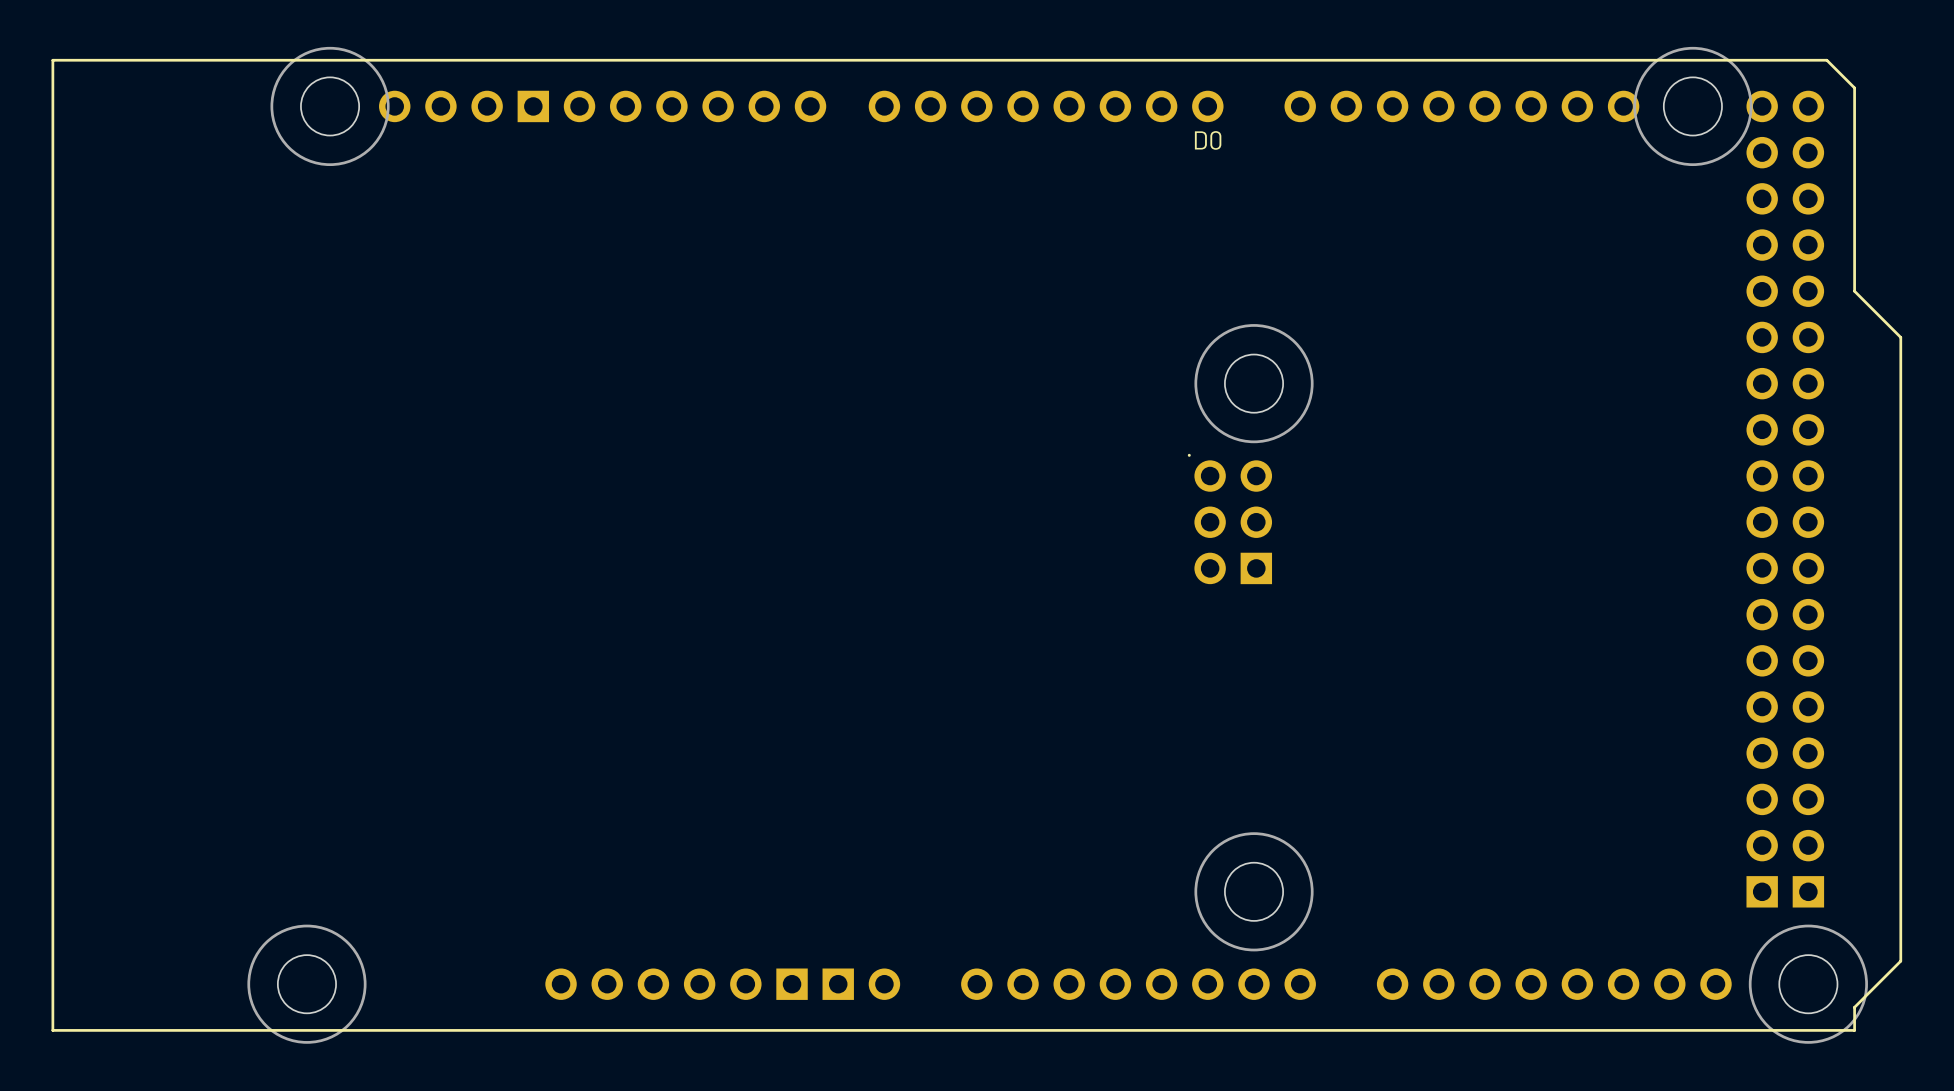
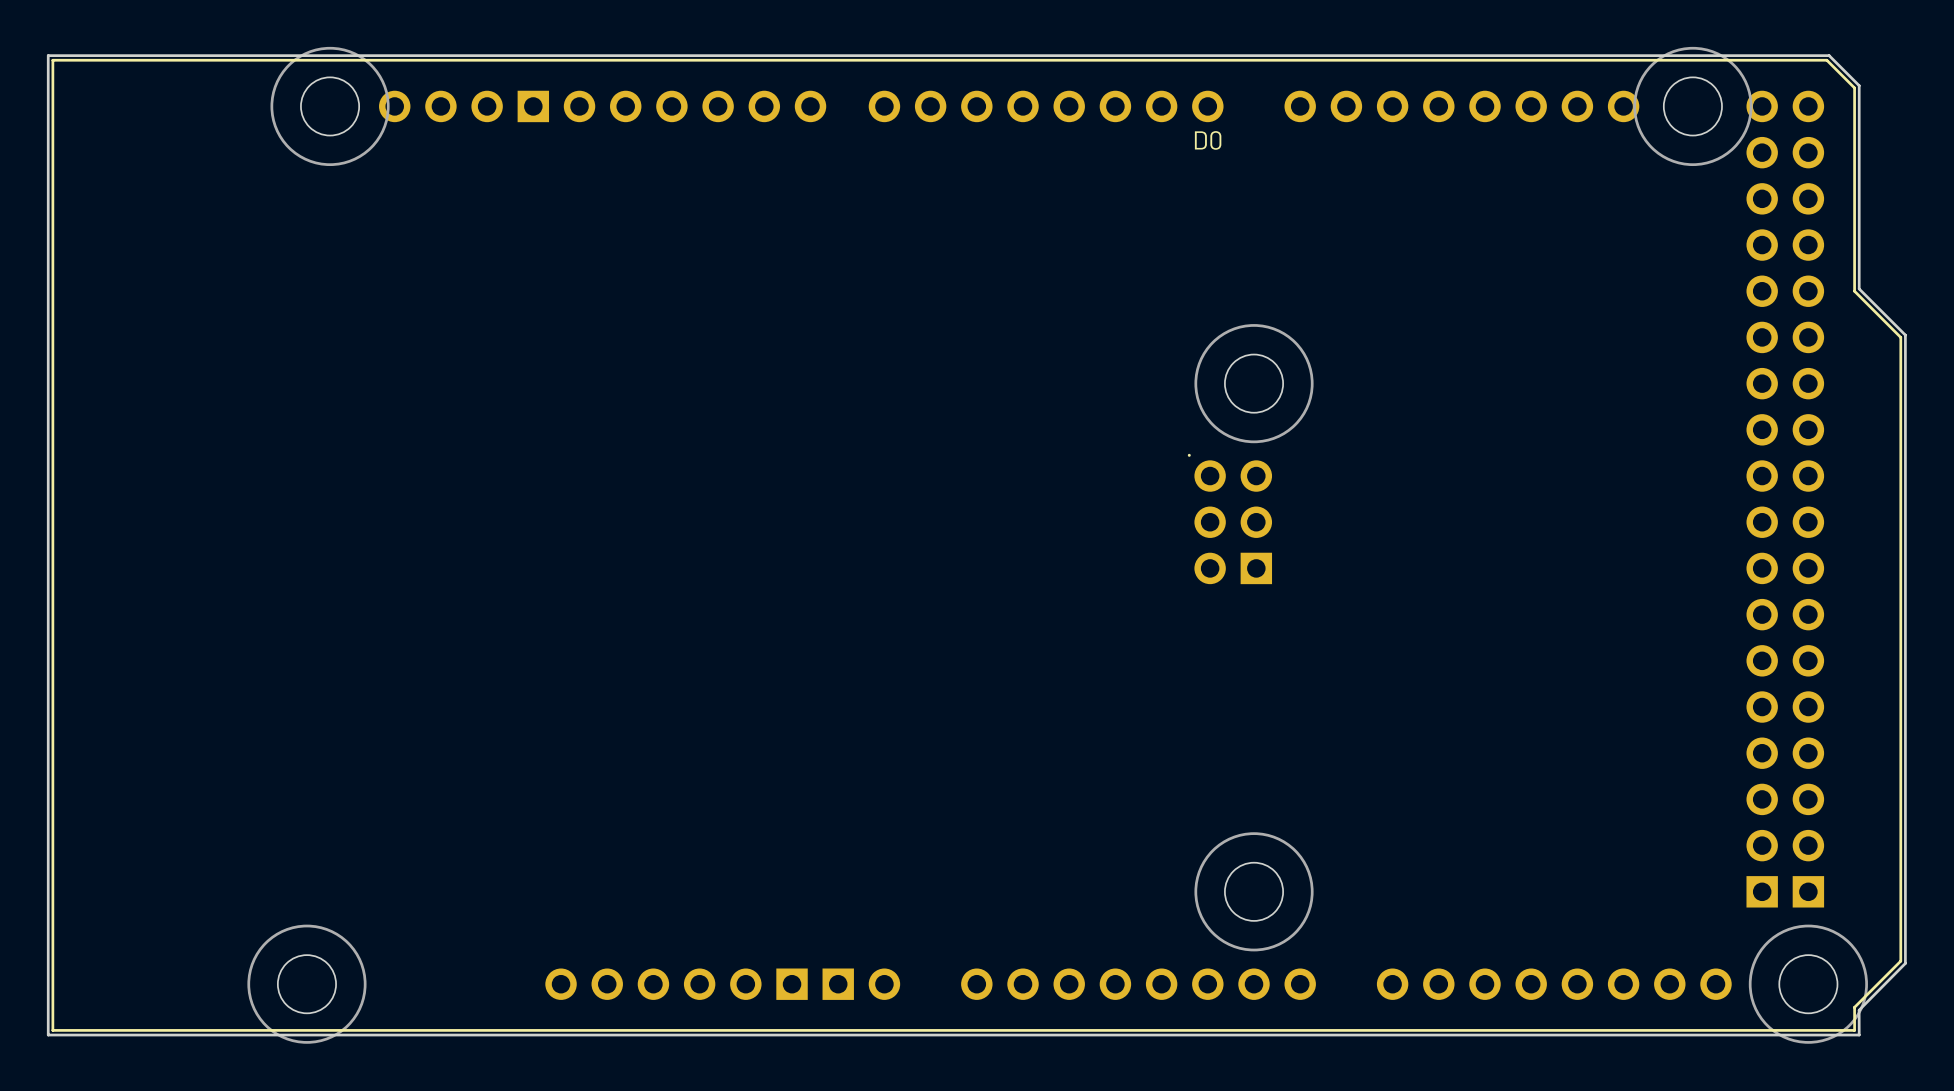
drawing: none -> [46, 54, 1907, 1037]

